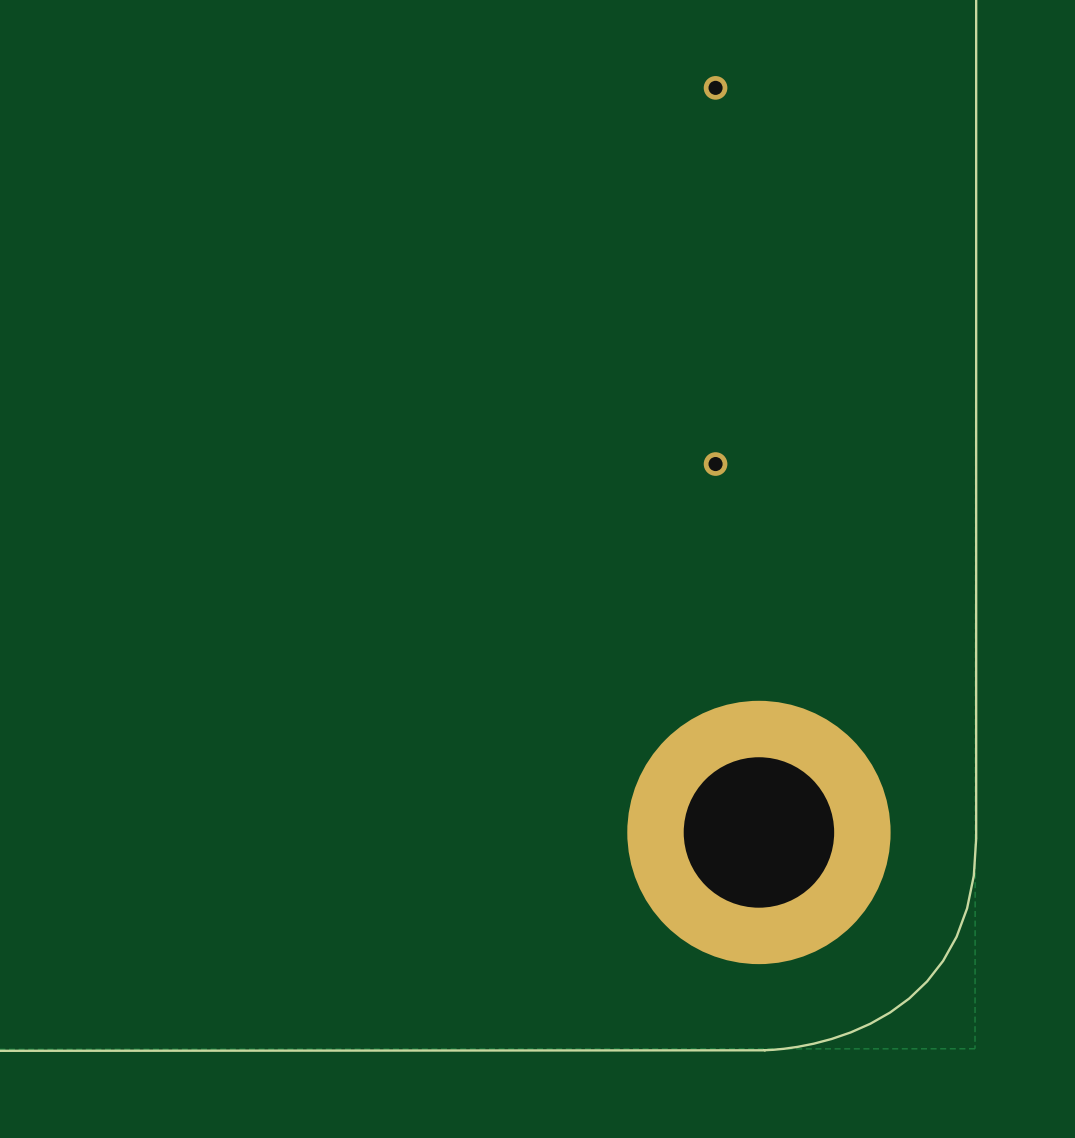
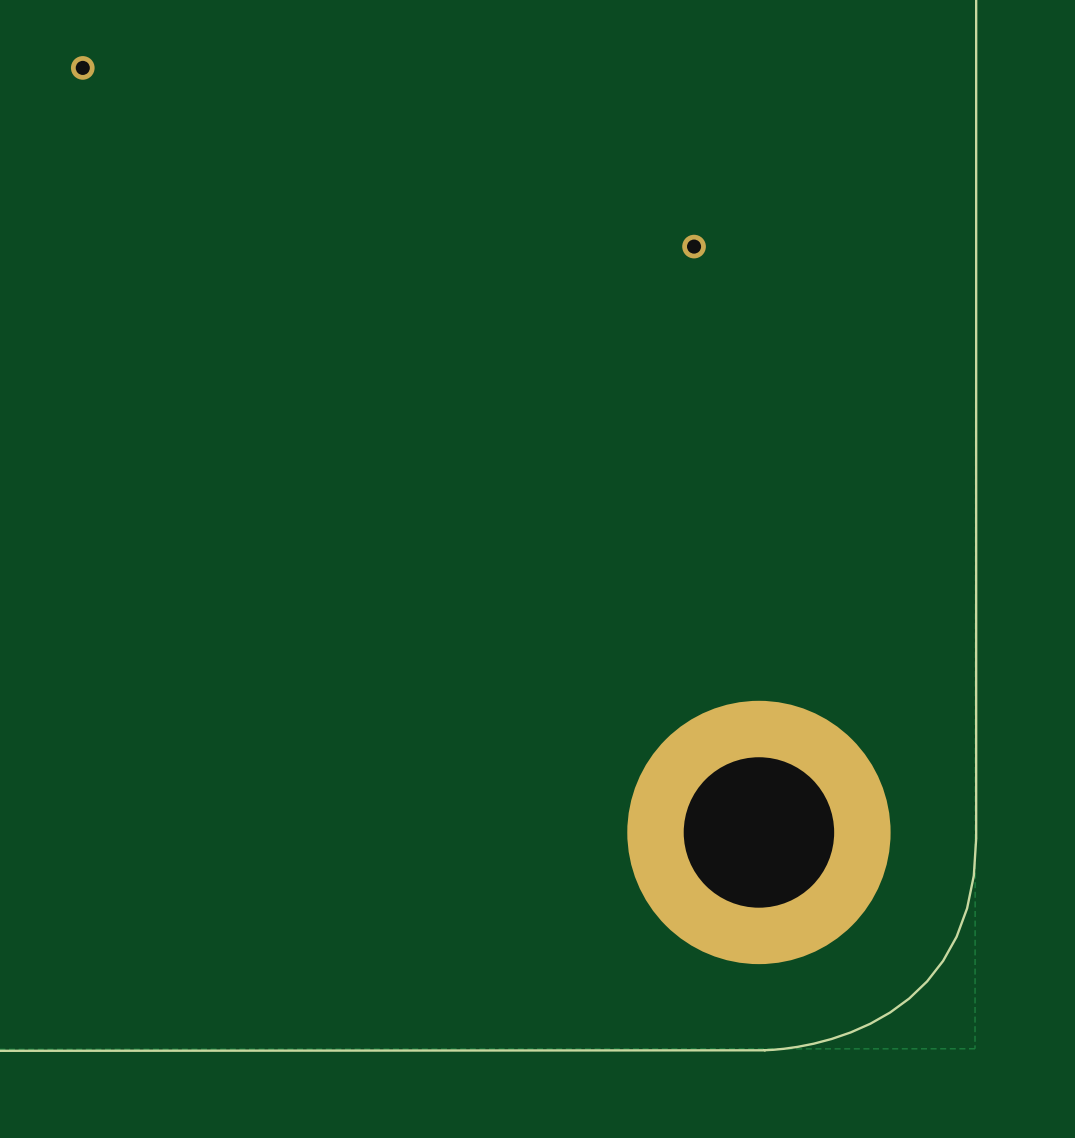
via: none -> (82, 67)
via: (715, 87) -> none
via: none -> (694, 246)
via: (715, 464) -> none

